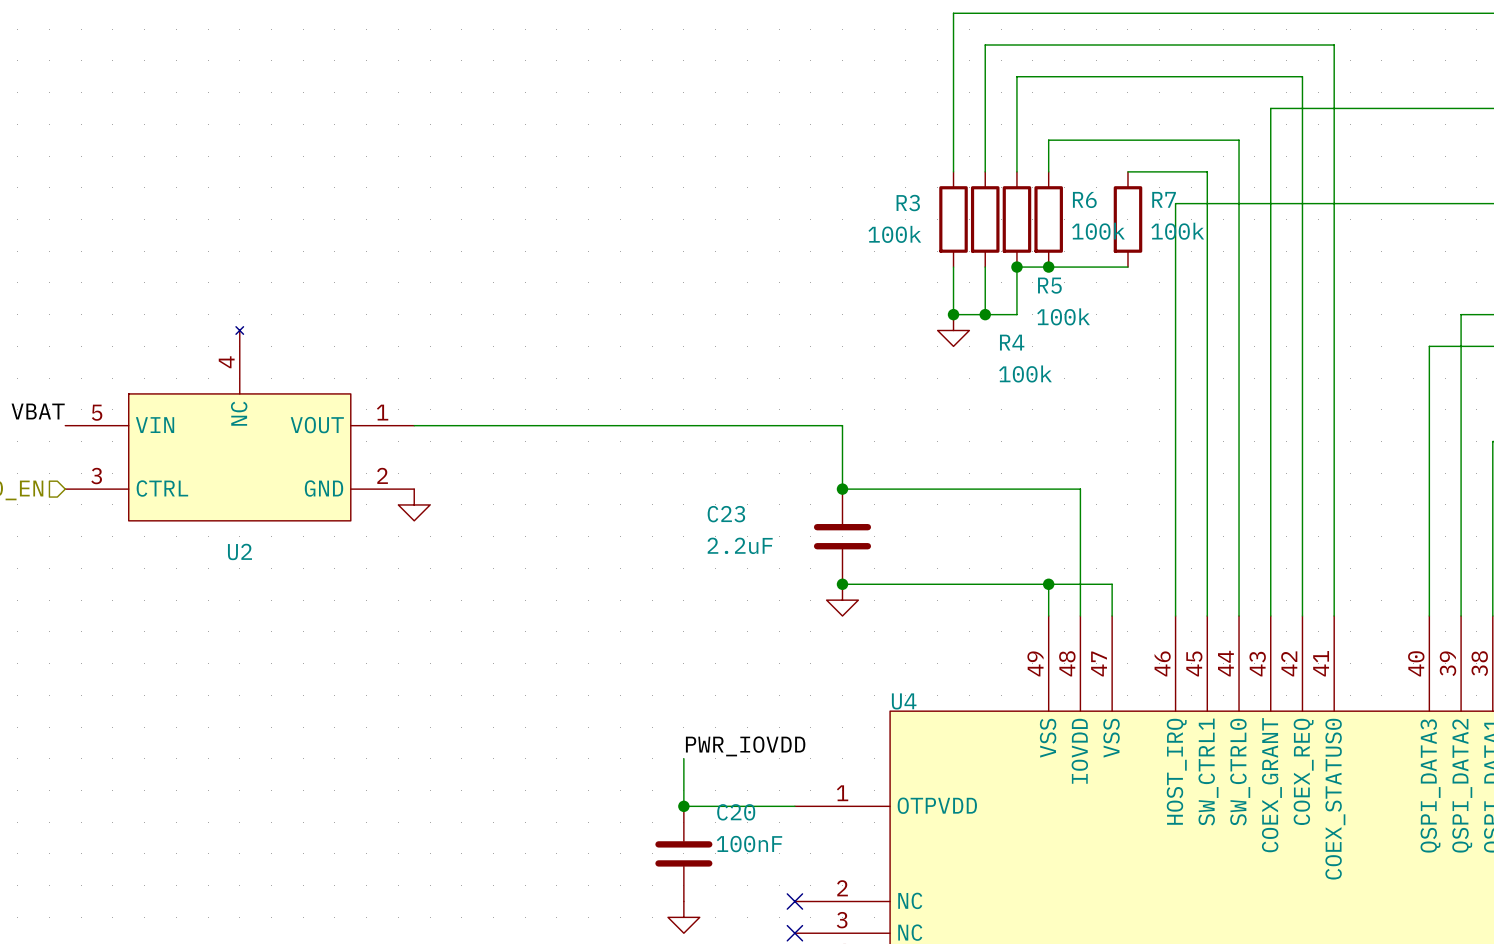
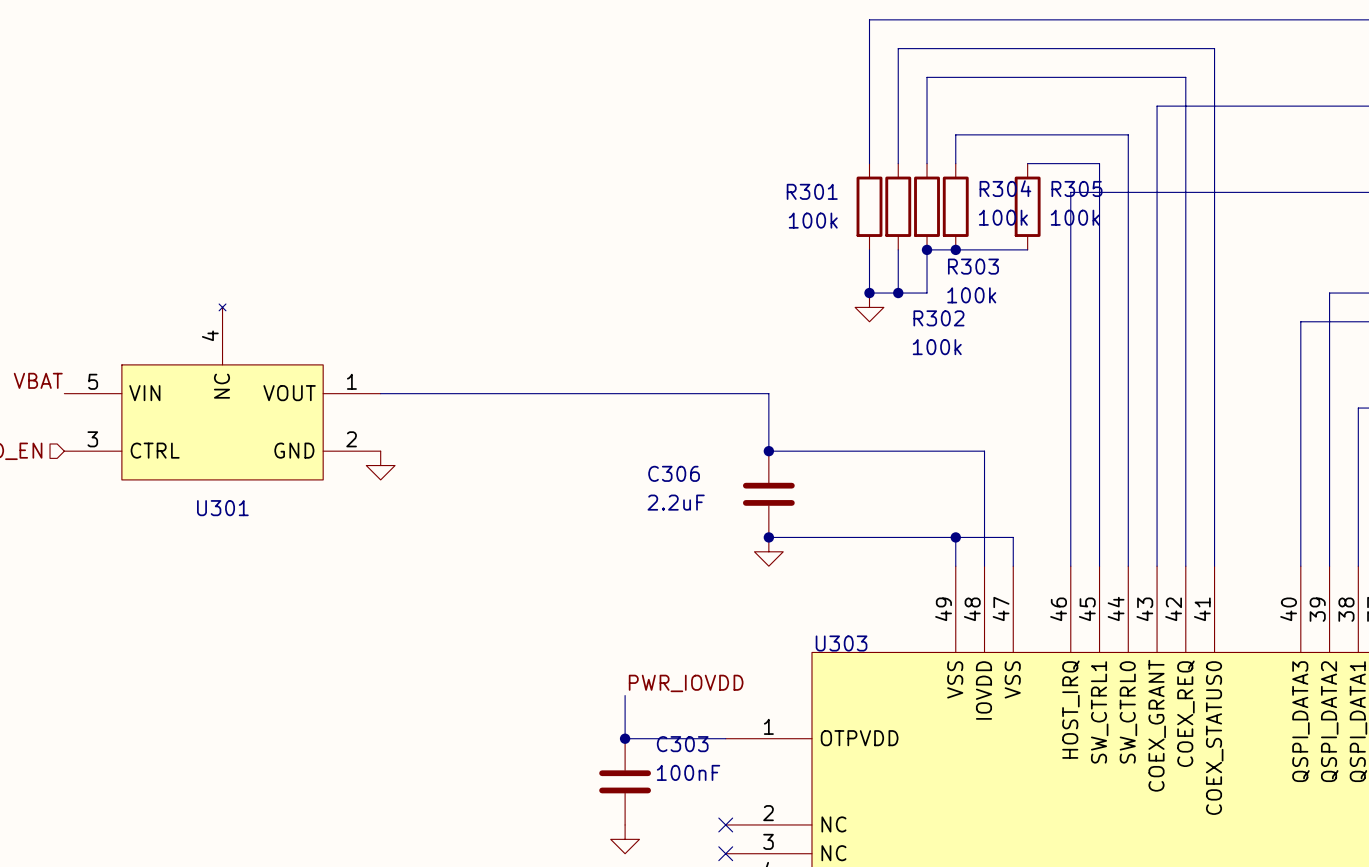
R6 name: R6 (1084, 199) -> R304 (1005, 188)
R7 name: R7 (1164, 199) -> R305 (1076, 188)
R3 name: R3 (908, 203) -> R301 (812, 191)
R5 name: R5 (1049, 285) -> R303 (973, 266)
R4 name: R4 (1012, 342) -> R302 (938, 318)
C23 name: C23 (726, 514) -> C306 (674, 473)
U2 name: U2 (239, 551) -> U301 (222, 508)
U4 name: U4 (904, 701) -> U303 (841, 643)
C20 name: C20 (736, 812) -> C303 (682, 744)

